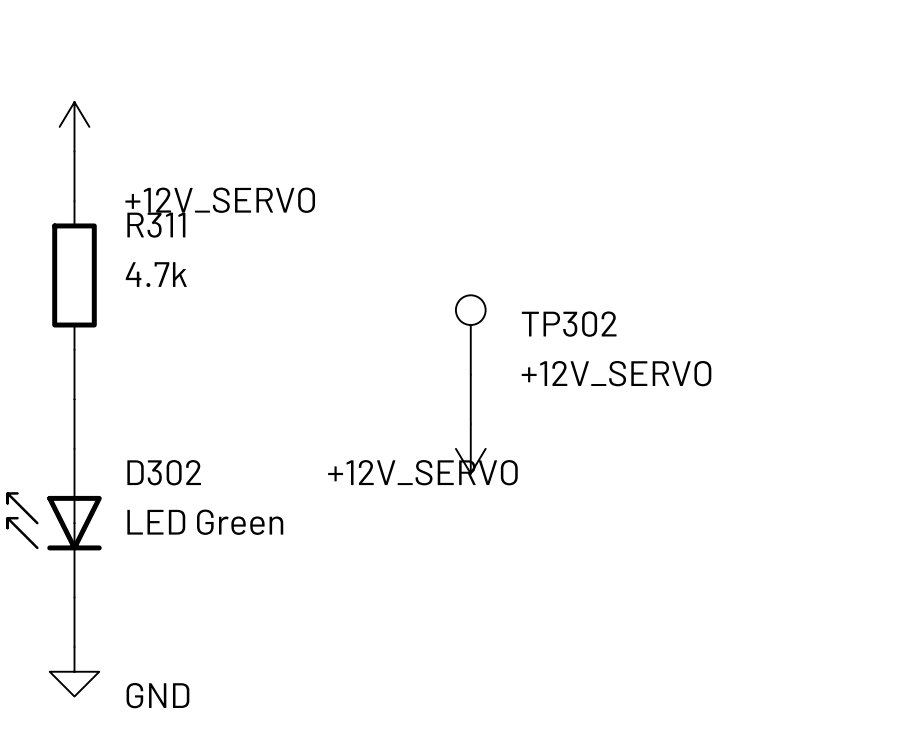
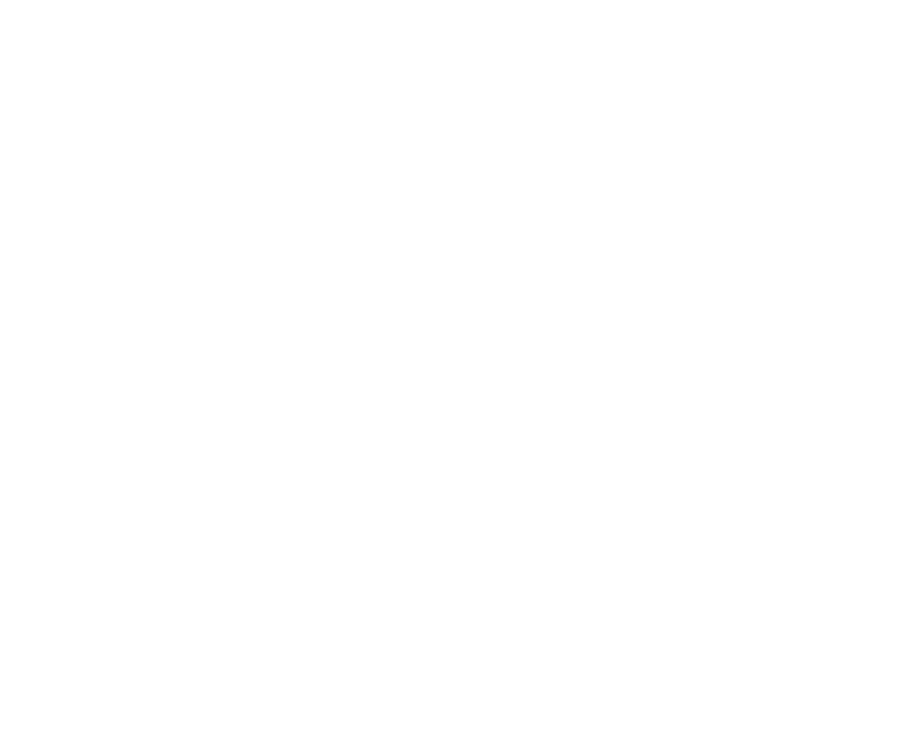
power symbol: +12V_SERVO (74, 126) -> none
wire: (74, 151) (74, 201) -> none
R311: 4.7k (74, 275) -> none
TP302: +12V_SERVO (470, 334) -> none
wire: (74, 349) (74, 448) -> none
wire: (470, 374) (470, 424) -> none
power symbol: +12V_SERVO (470, 448) -> none
D302: LED Green (54, 523) -> none
wire: (74, 597) (74, 646) -> none
power symbol: GND (74, 671) -> none

